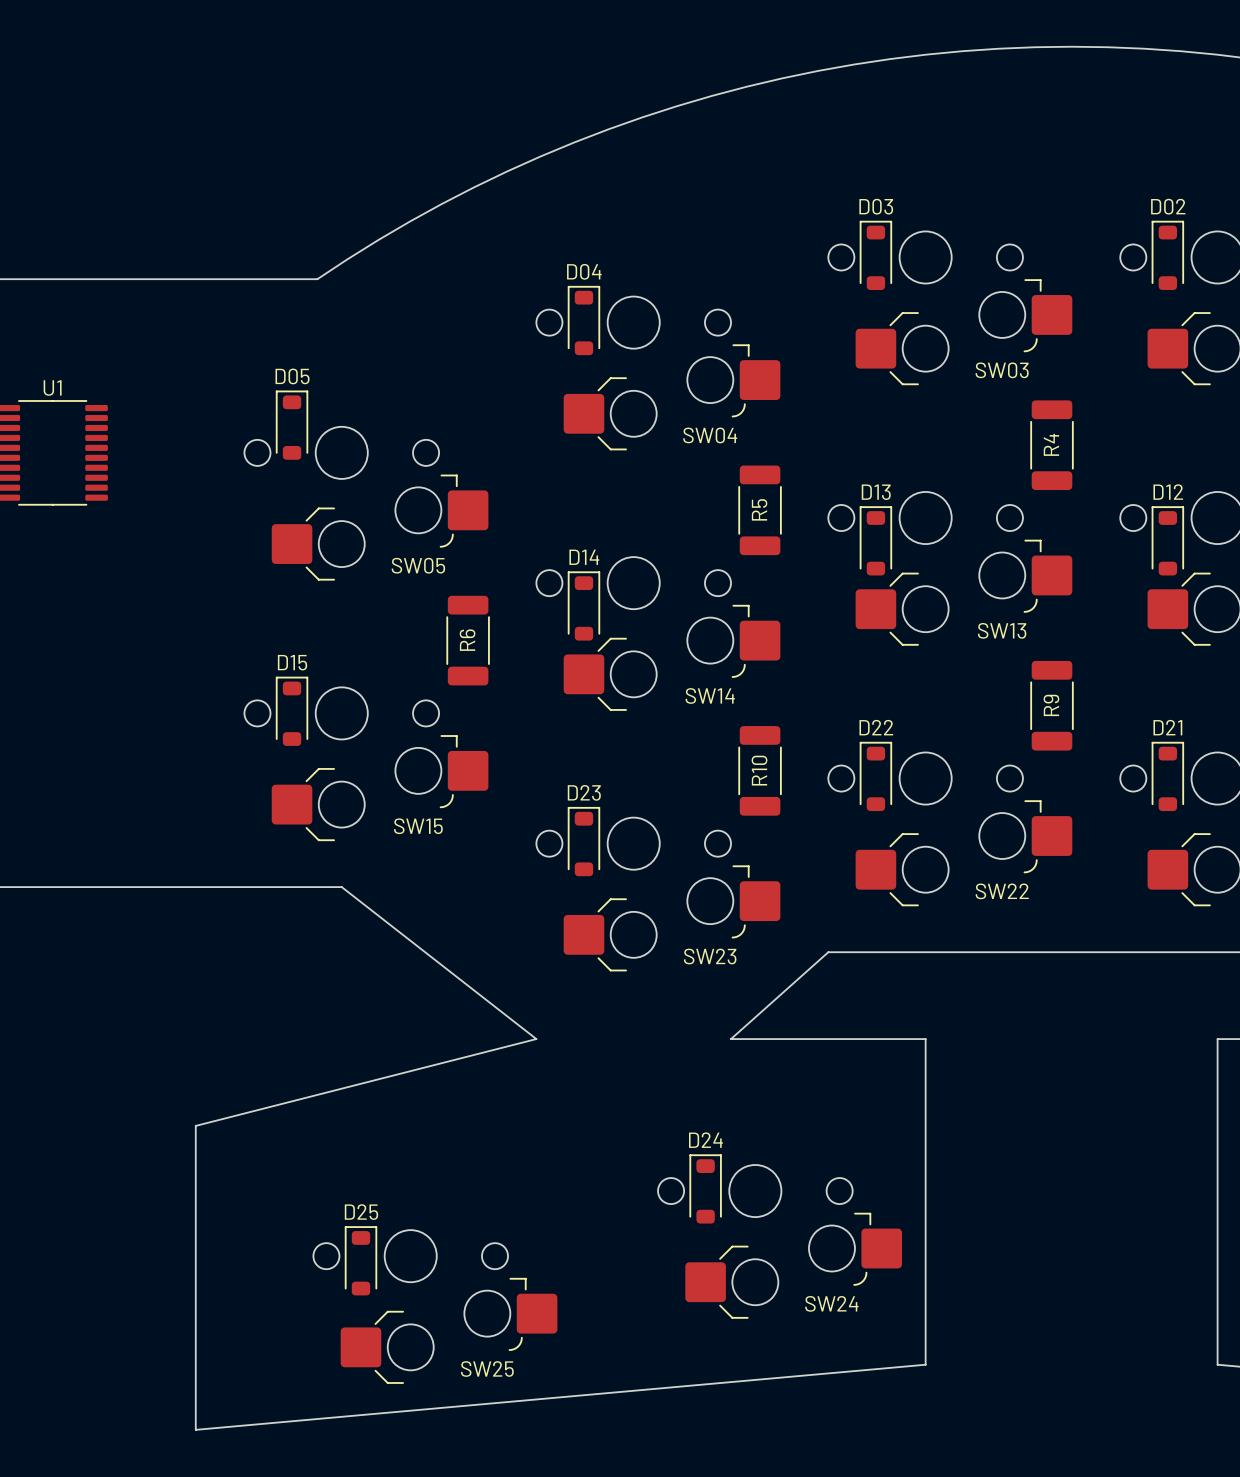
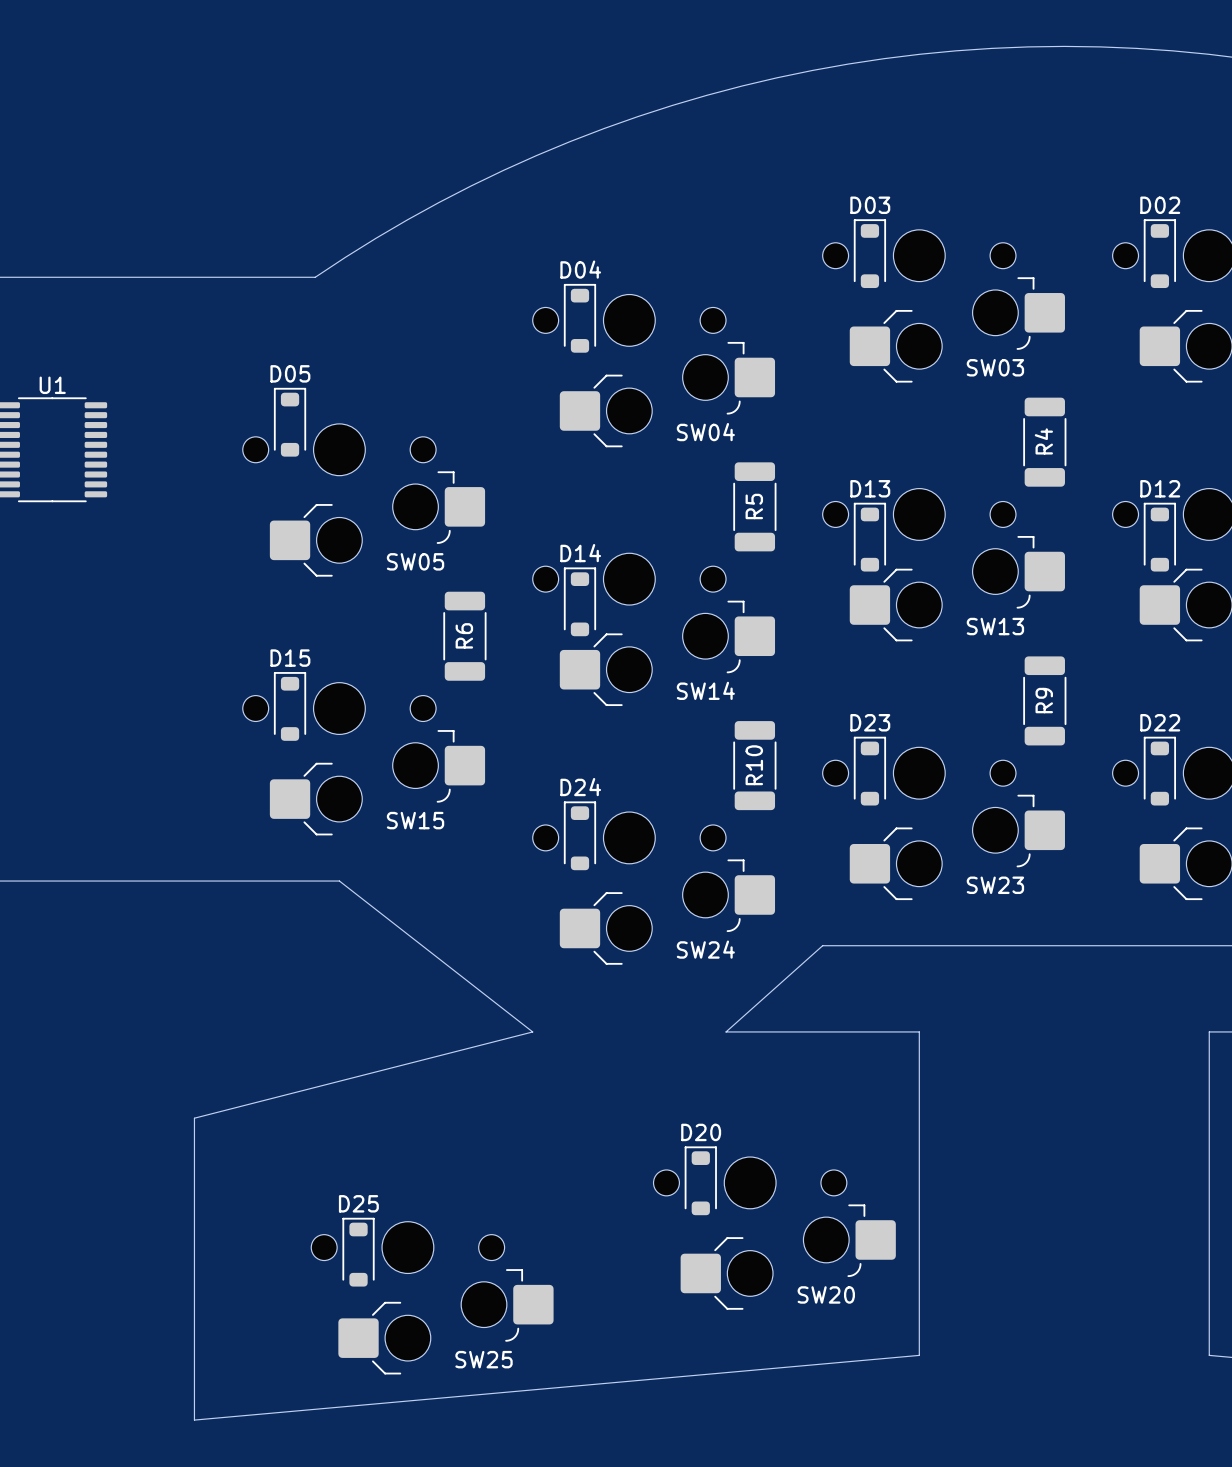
D22 name: D22 (876, 727) -> D23 (870, 722)
D21 name: D21 (1167, 727) -> D22 (1160, 722)
D23 name: D23 (584, 792) -> D24 (580, 787)
SW22 name: SW22 (1002, 891) -> SW23 (995, 885)
SW23 name: SW23 (710, 956) -> SW24 (705, 949)
D24 name: D24 (705, 1140) -> D20 (701, 1132)
SW24 name: SW24 (831, 1303) -> SW20 (826, 1294)

